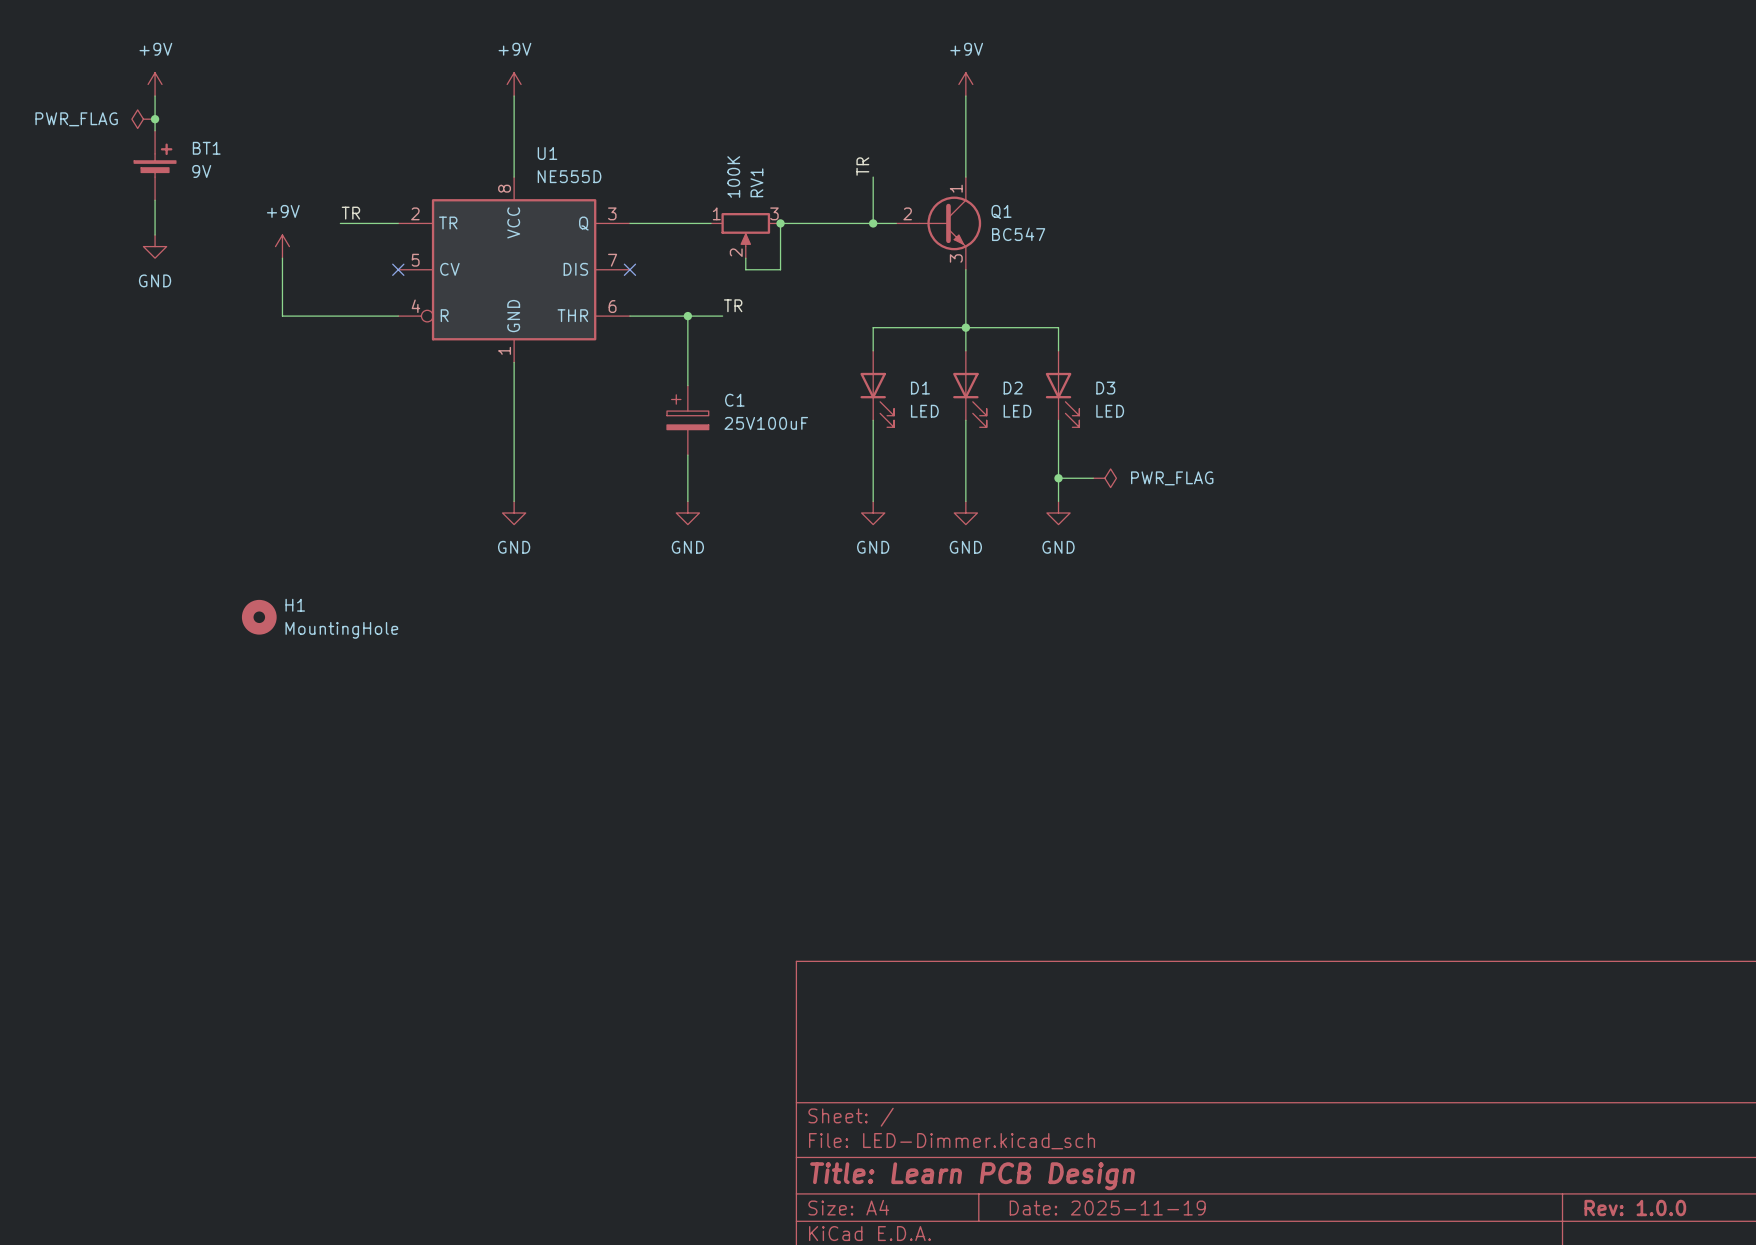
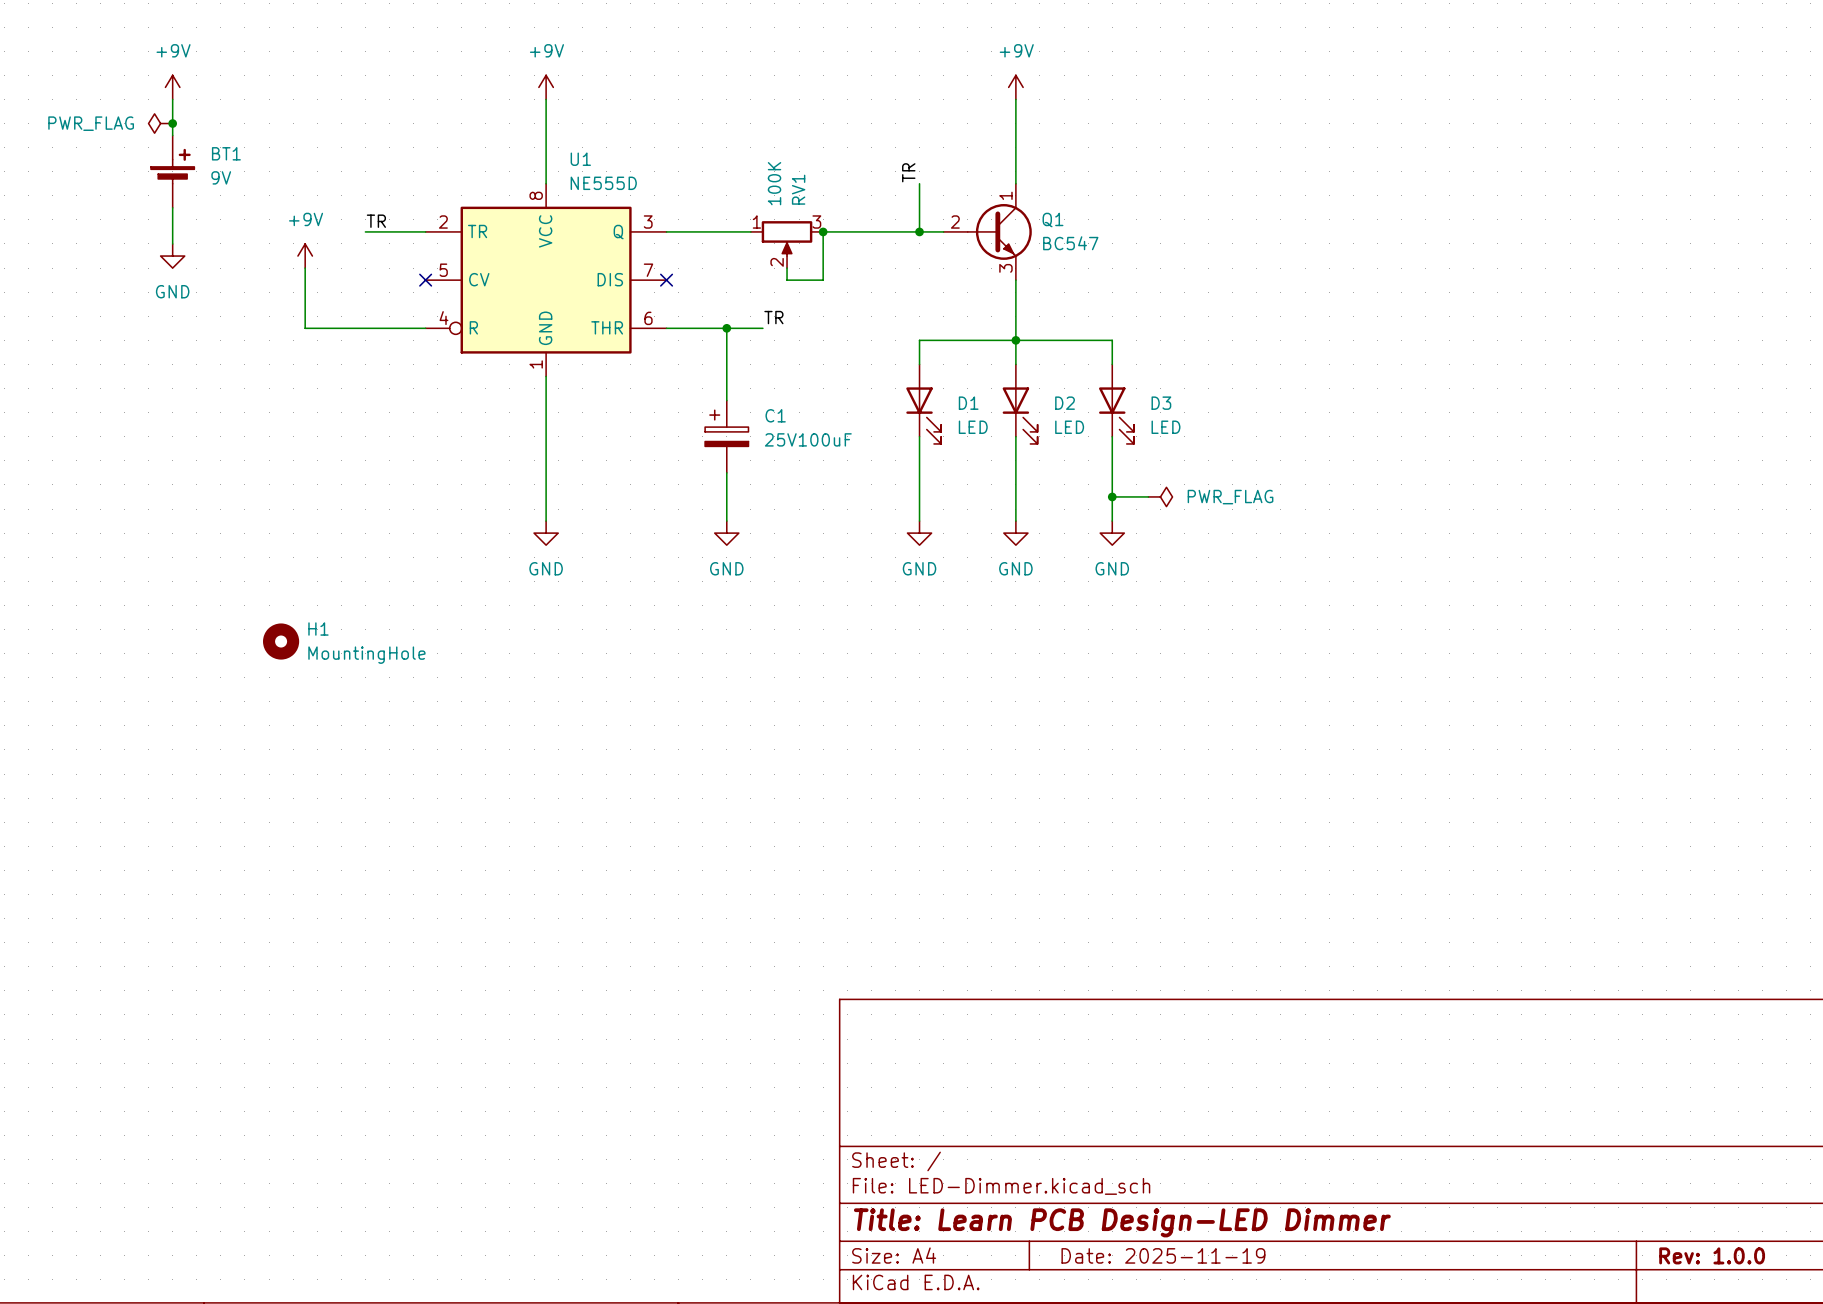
title block: Title: Learn PCB Design (972, 1176) -> Title: Learn PCB Design-LED Dimmer (1122, 1222)

